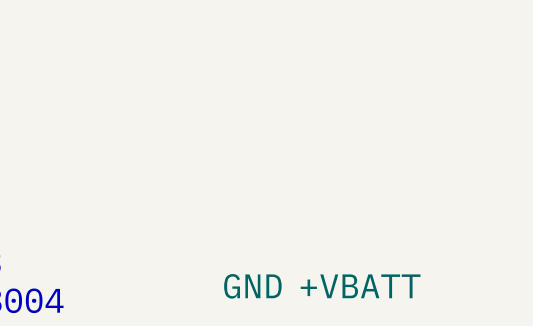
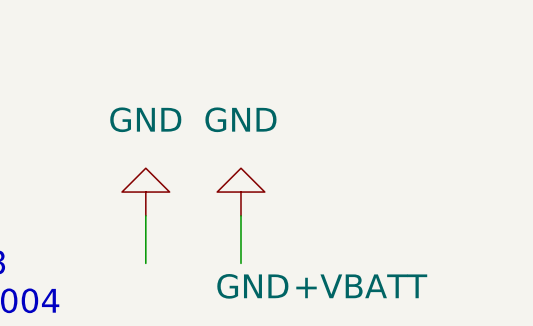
power symbol: none -> GND (145, 192)
power symbol: none -> GND (240, 192)
wire: none -> (145, 215) (145, 263)
wire: none -> (240, 215) (240, 263)

